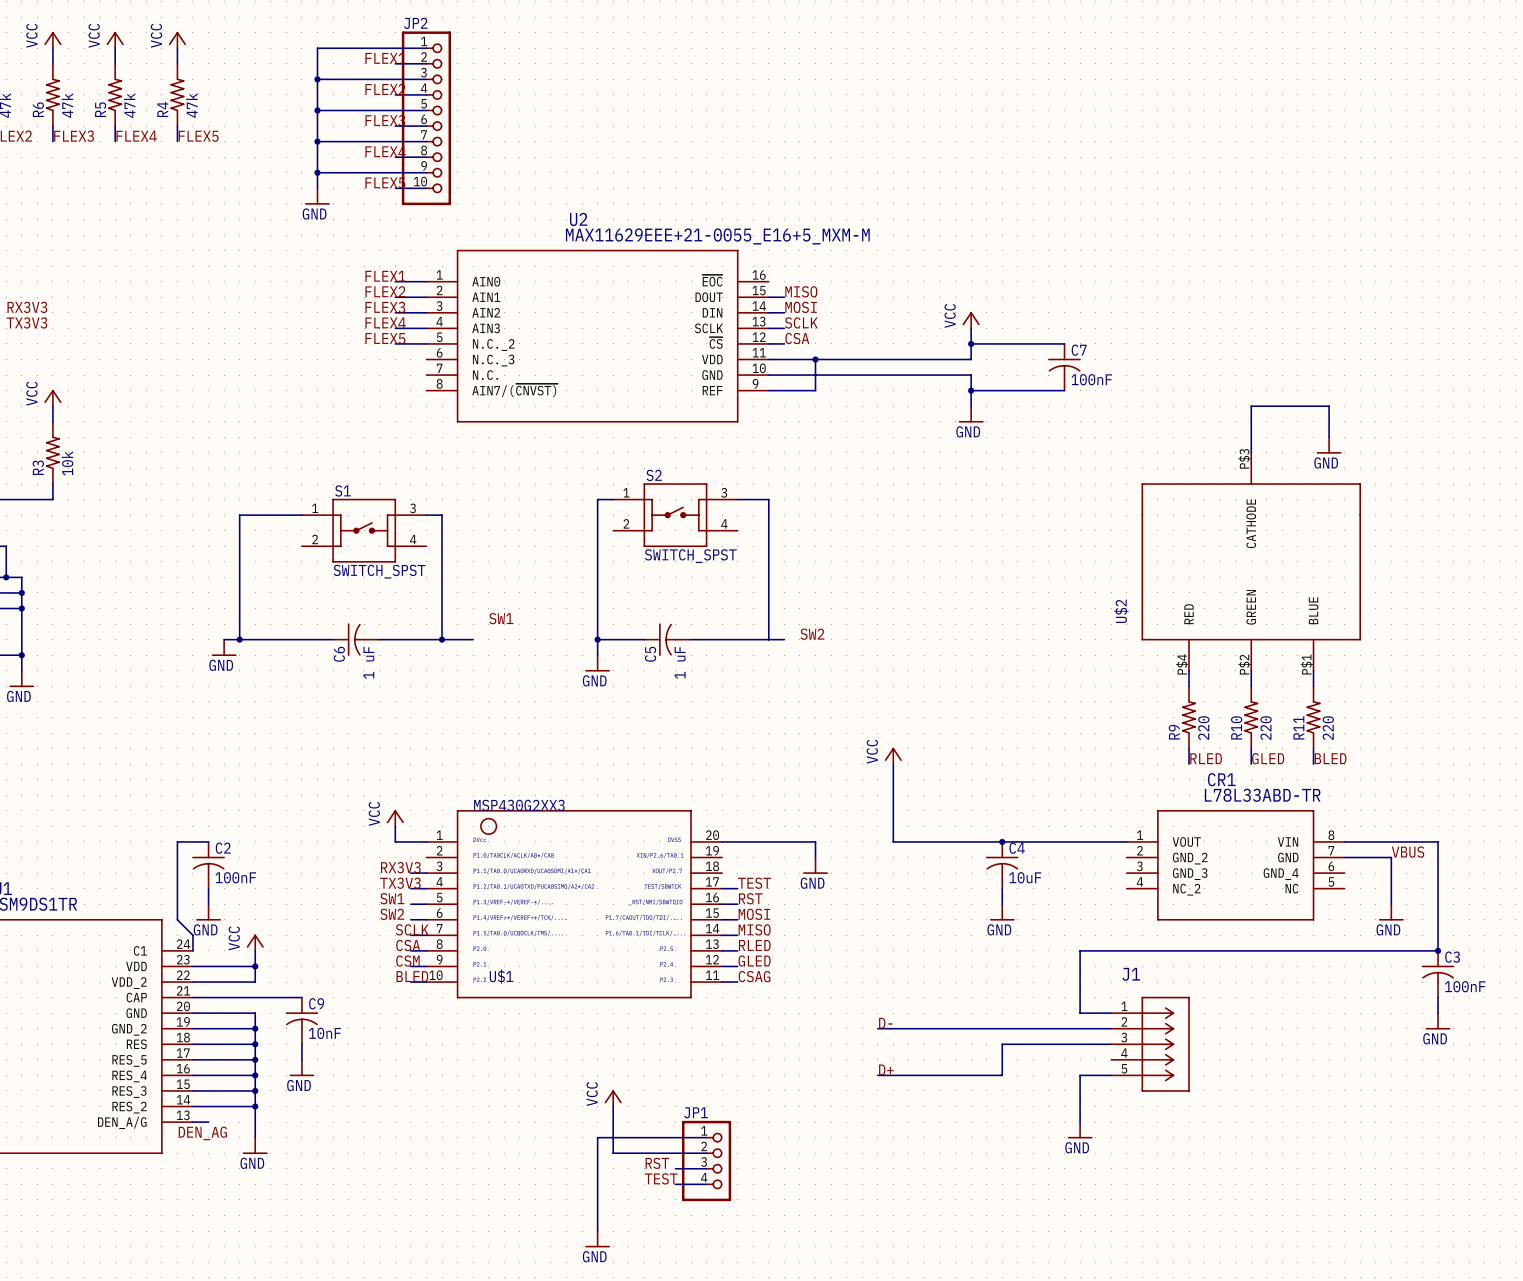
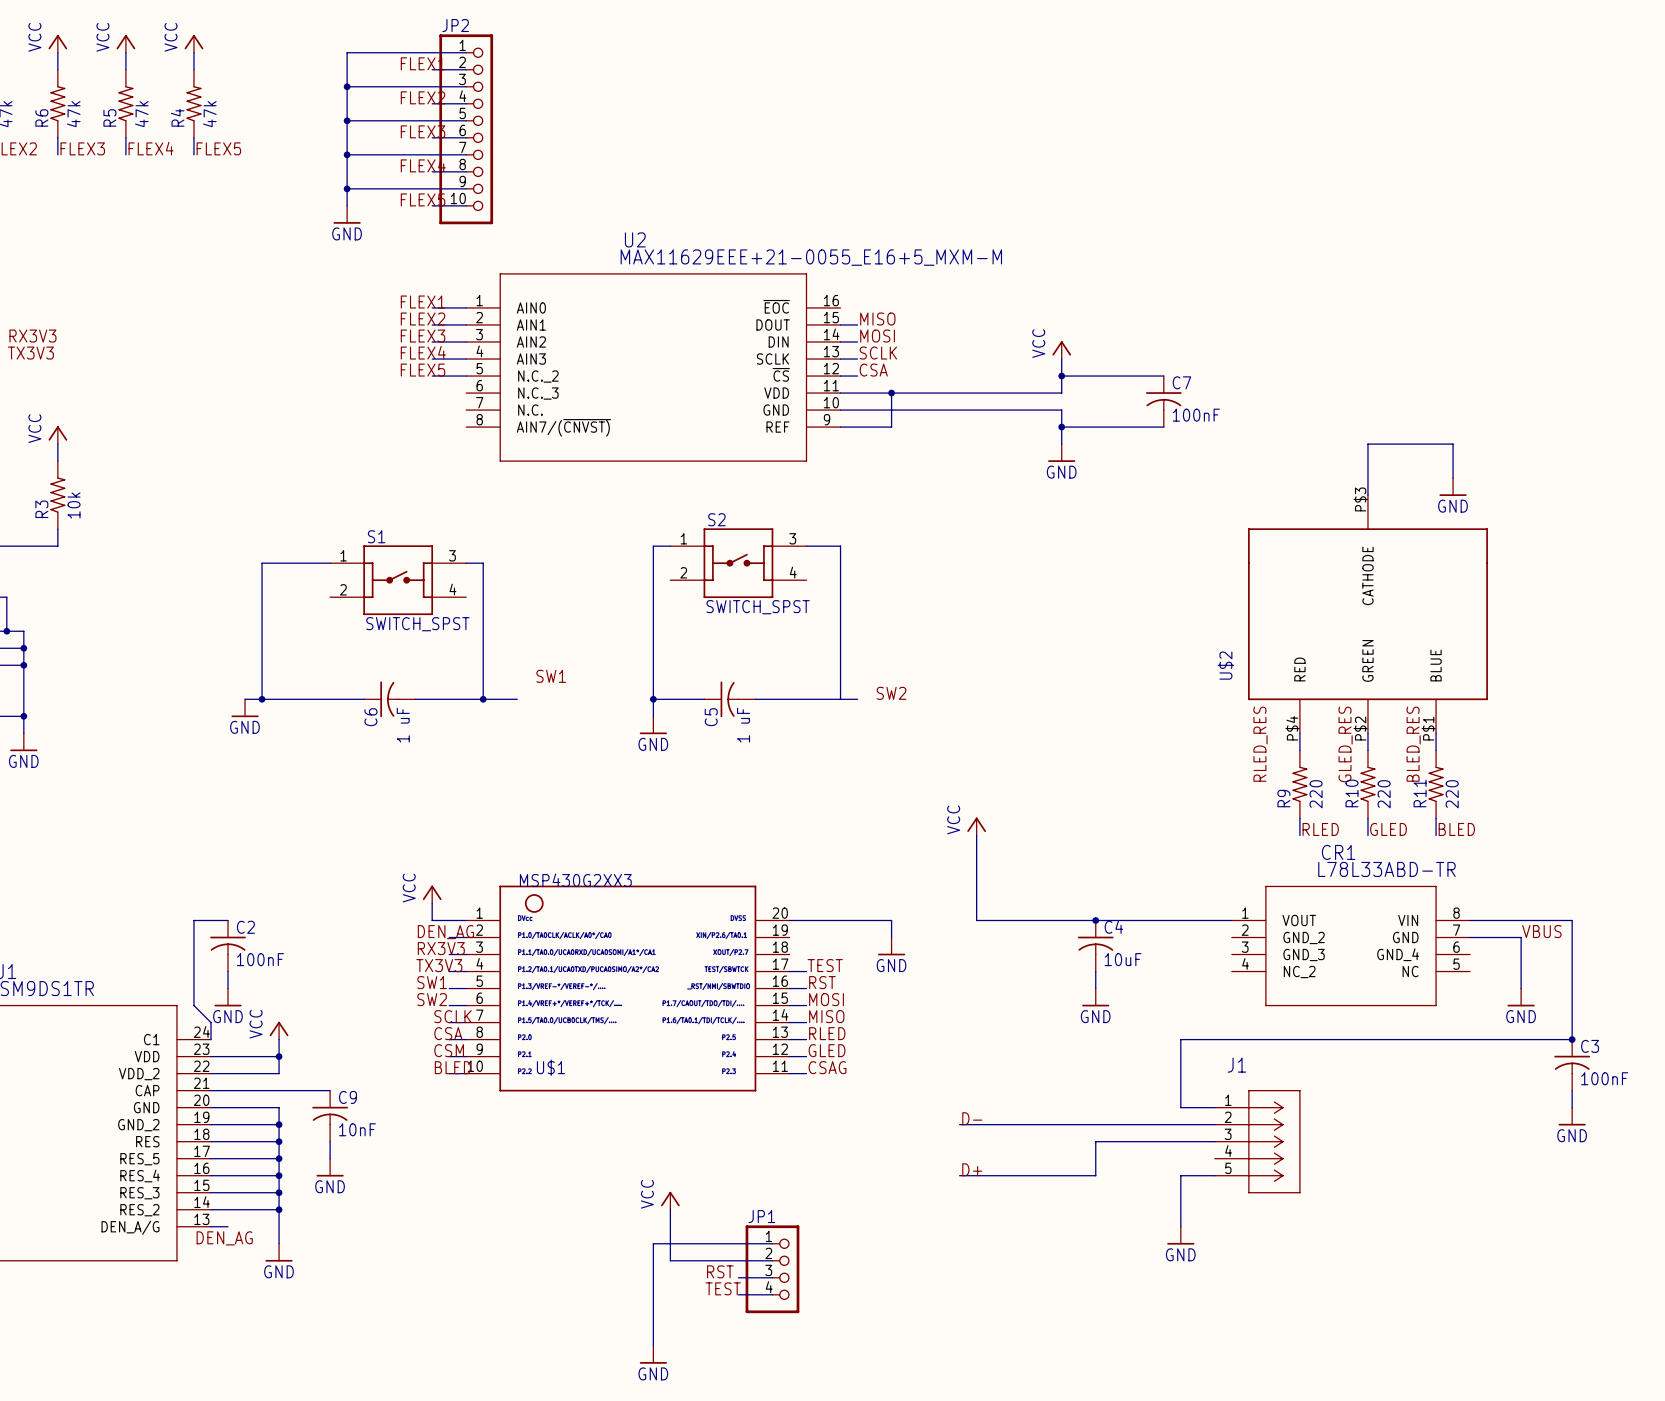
label: none -> RLED_RES (1260, 744)
label: none -> GLED_RES (1345, 744)
label: none -> BLED_RES (1413, 744)
label: none -> DEN_AG (445, 932)
wire: none -> (449, 937) (466, 937)

